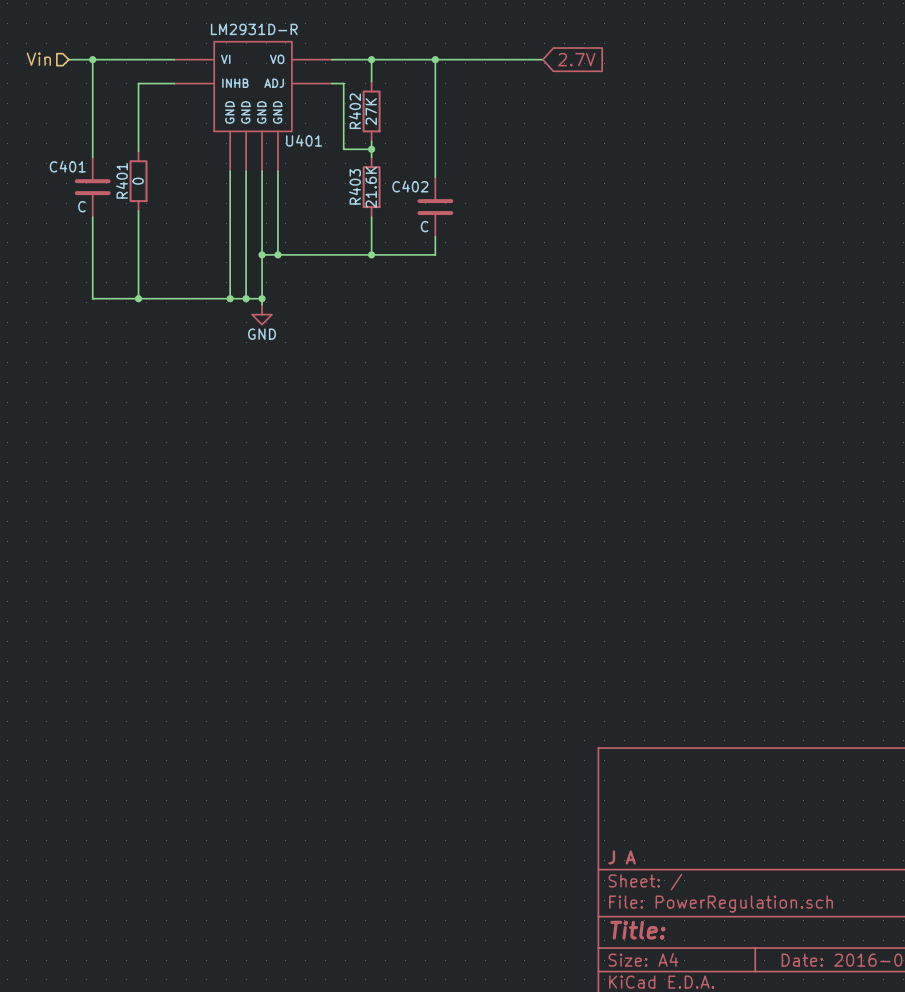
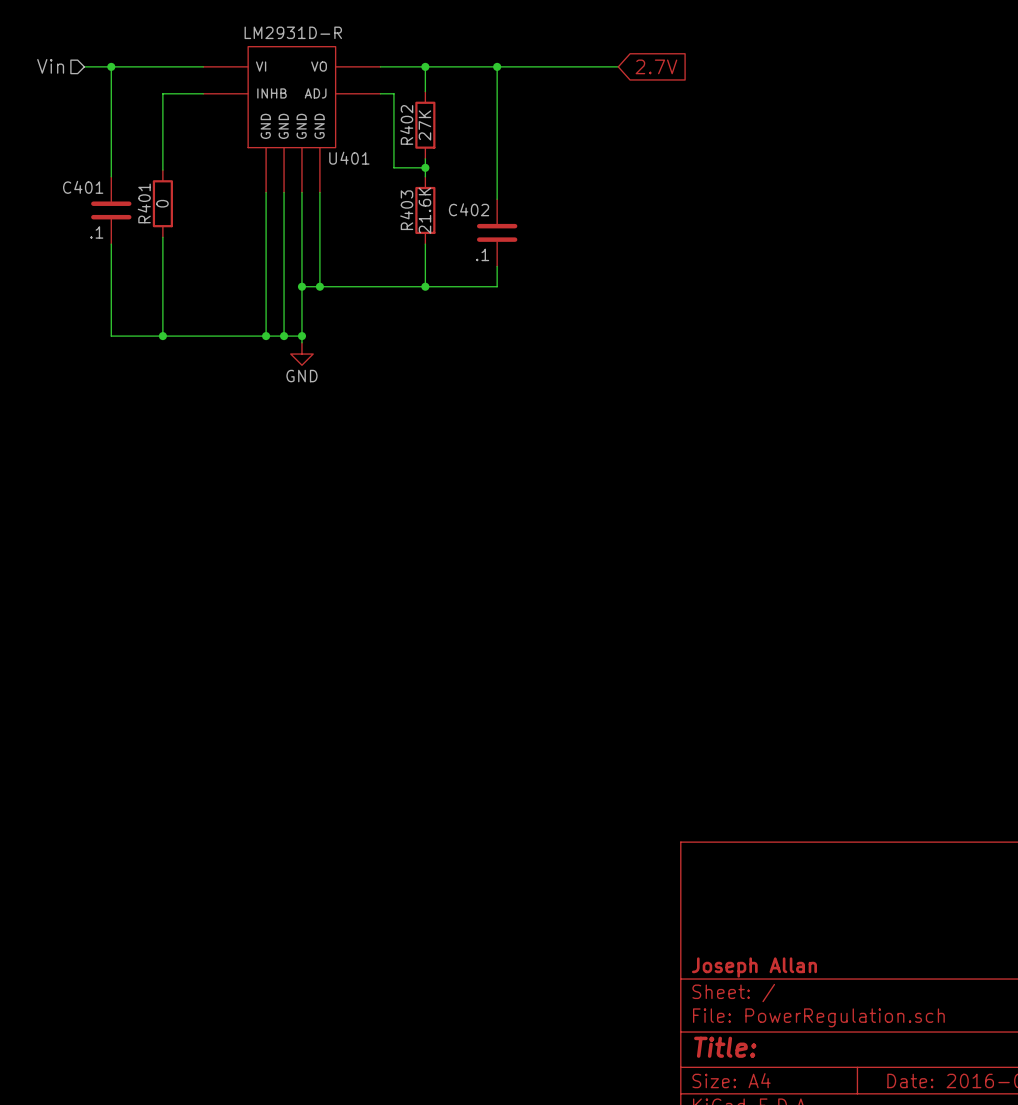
C401 value: C (81, 206) -> .1 (96, 232)
C402 value: C (424, 226) -> .1 (482, 254)
title block: J A (622, 857) -> Joseph Allan (754, 967)

